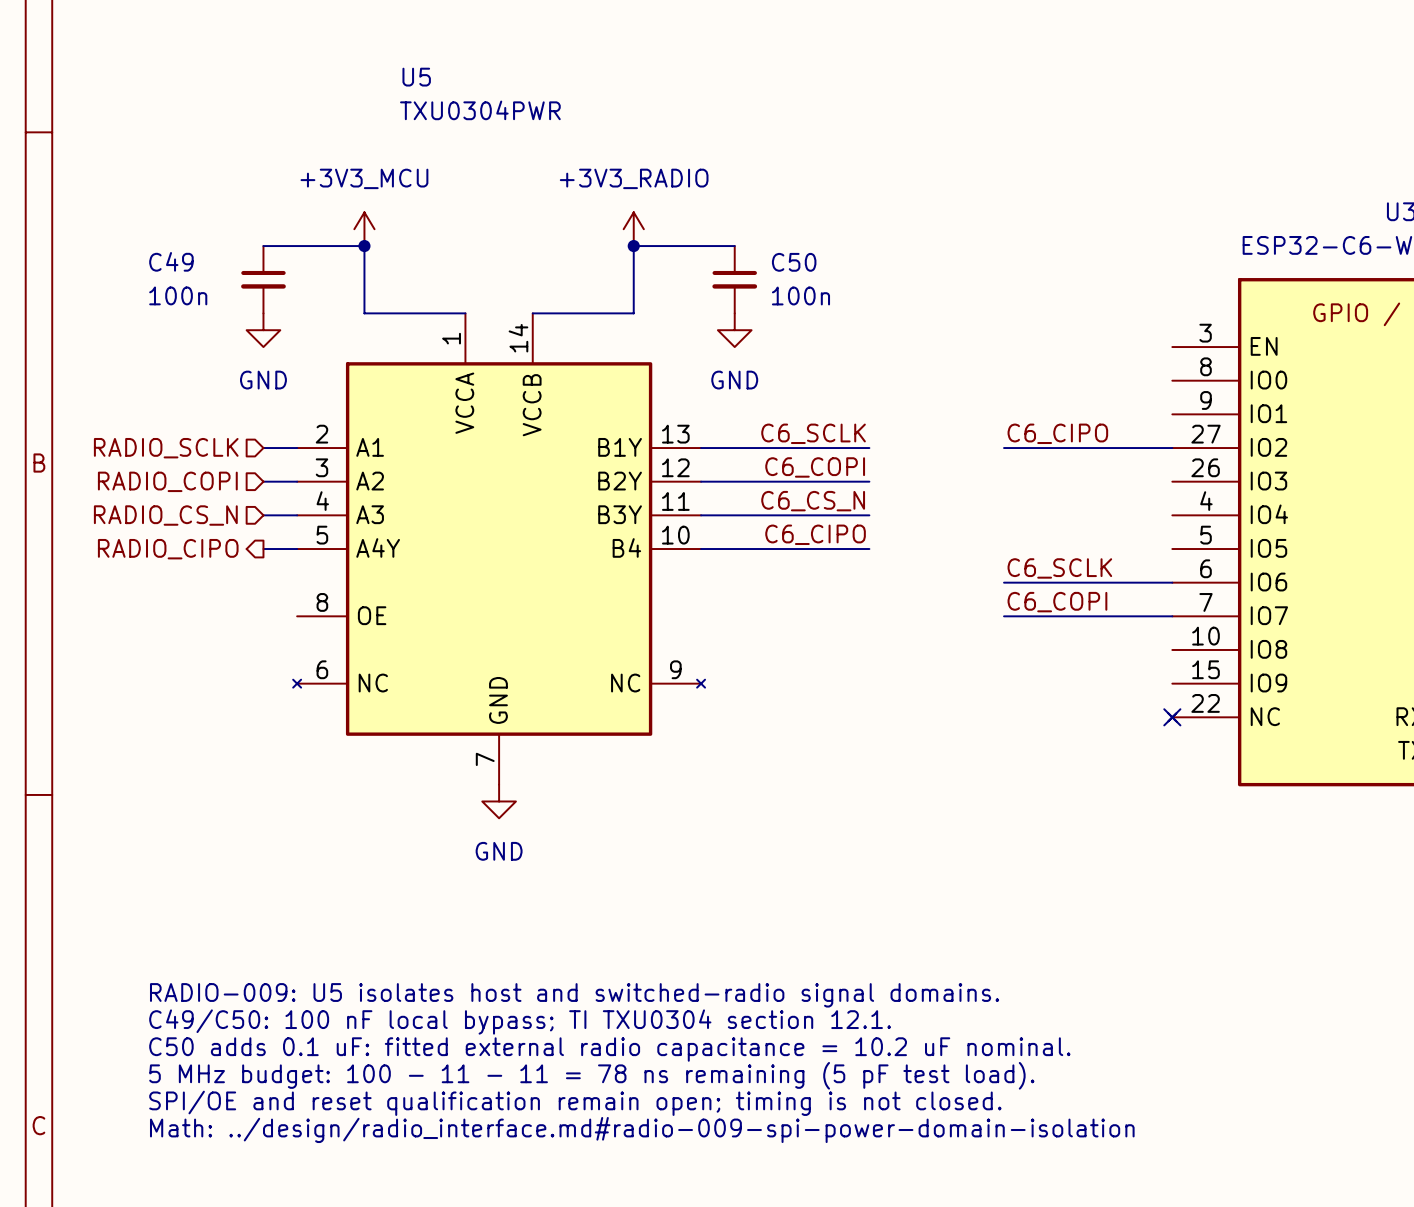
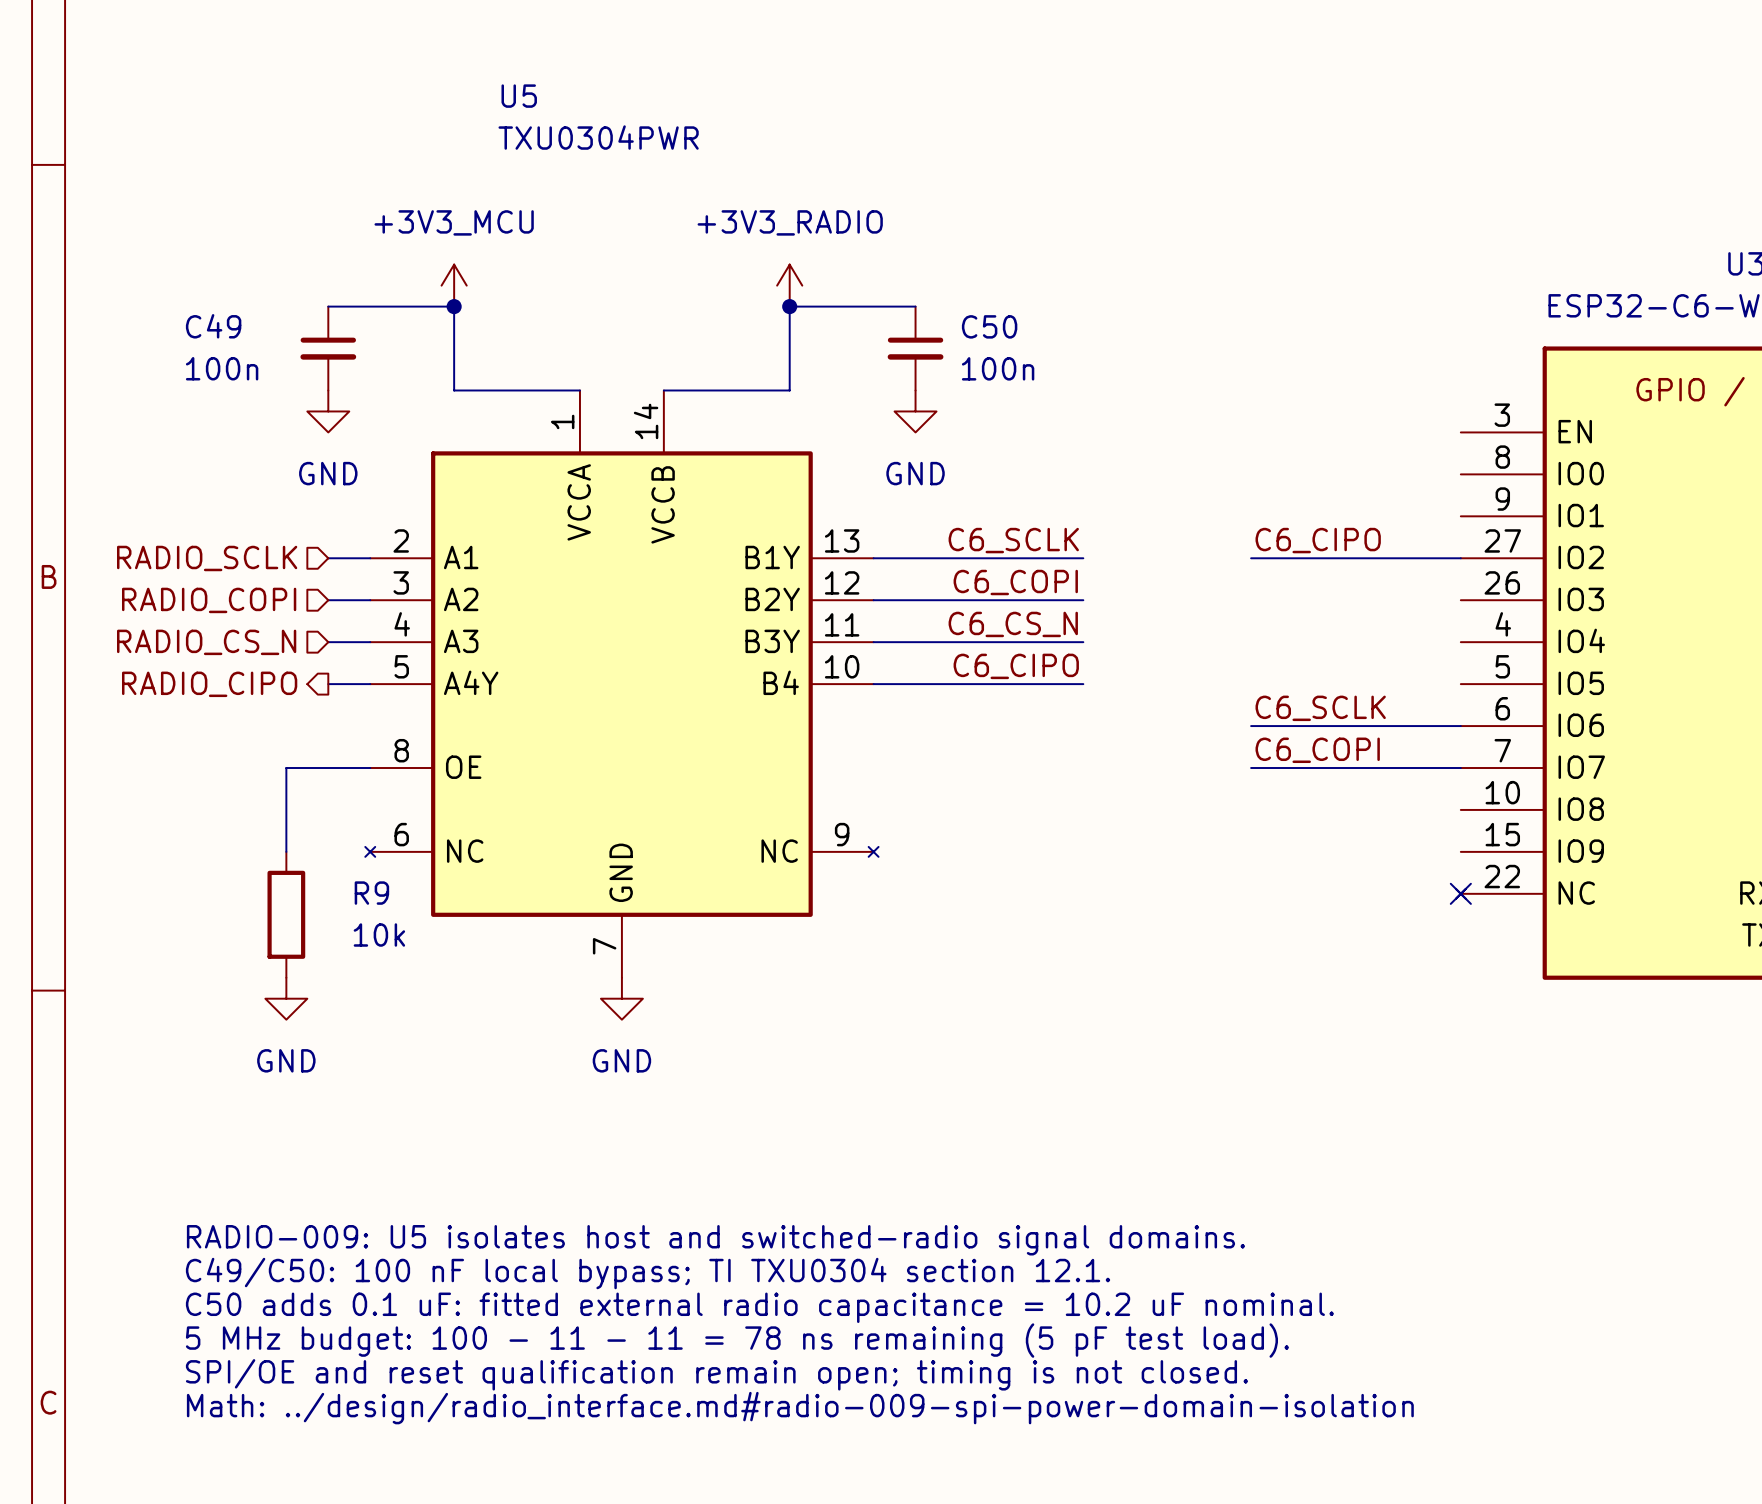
wire: none -> (370, 768) (286, 768) (286, 851)
R9: none -> 10k (286, 914)
power symbol: none -> GND (286, 998)

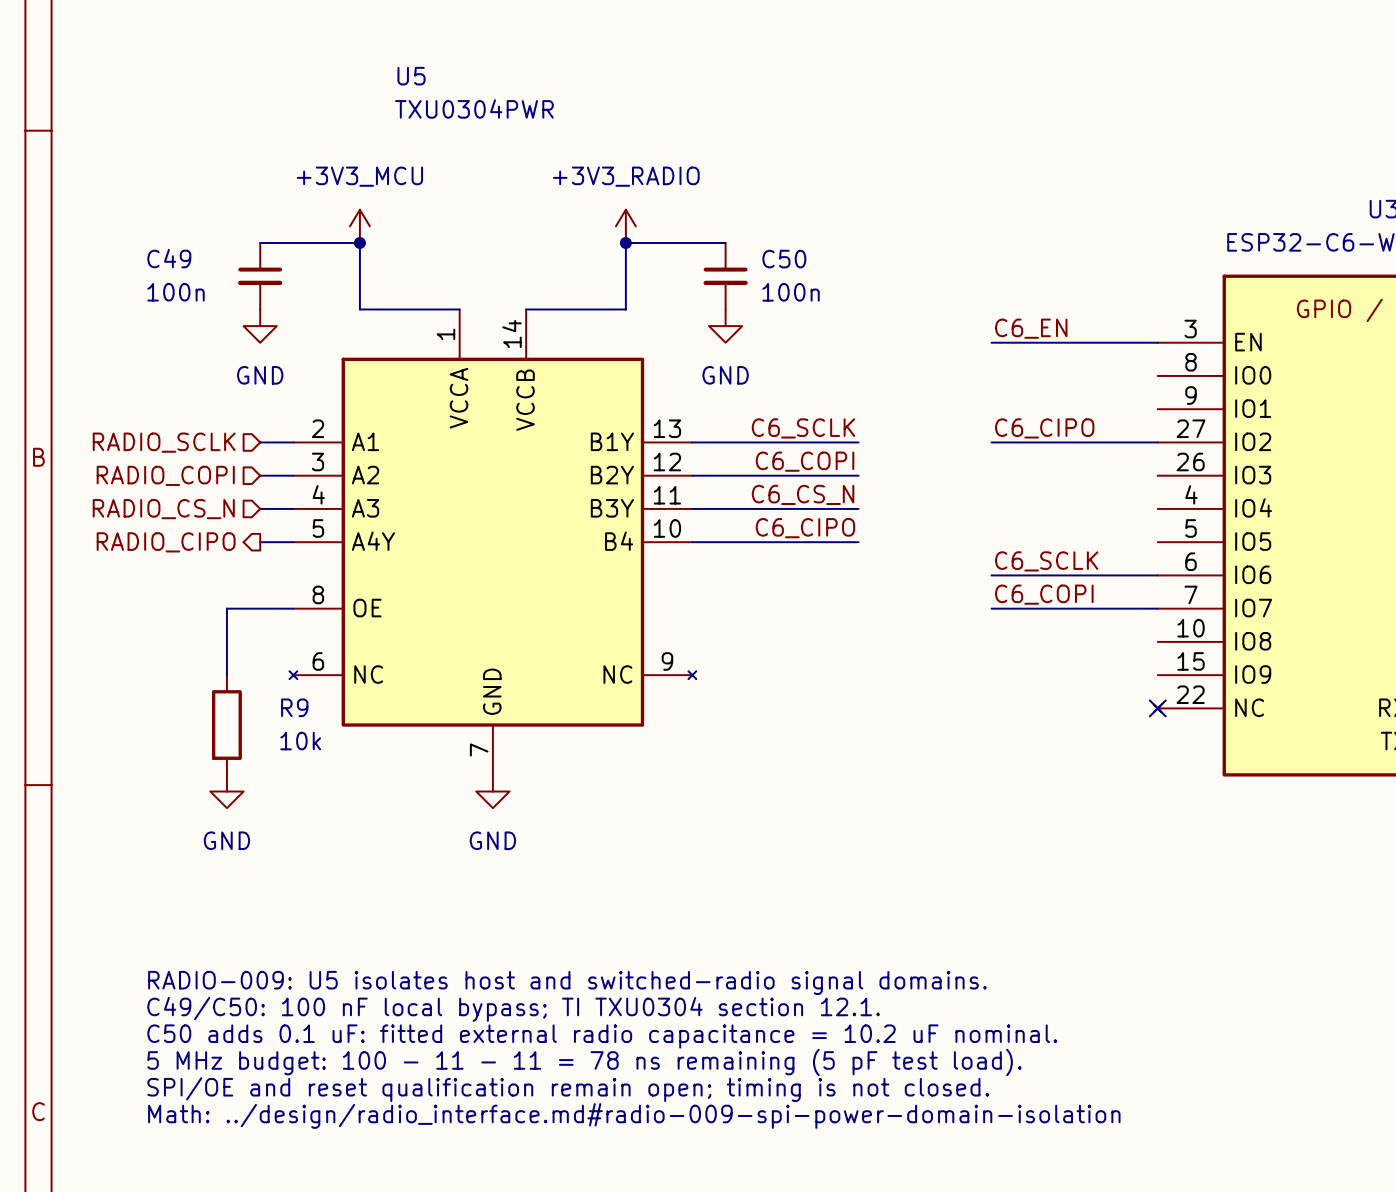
label: none -> C6_EN (1031, 328)
wire: none -> (991, 342) (1157, 342)

